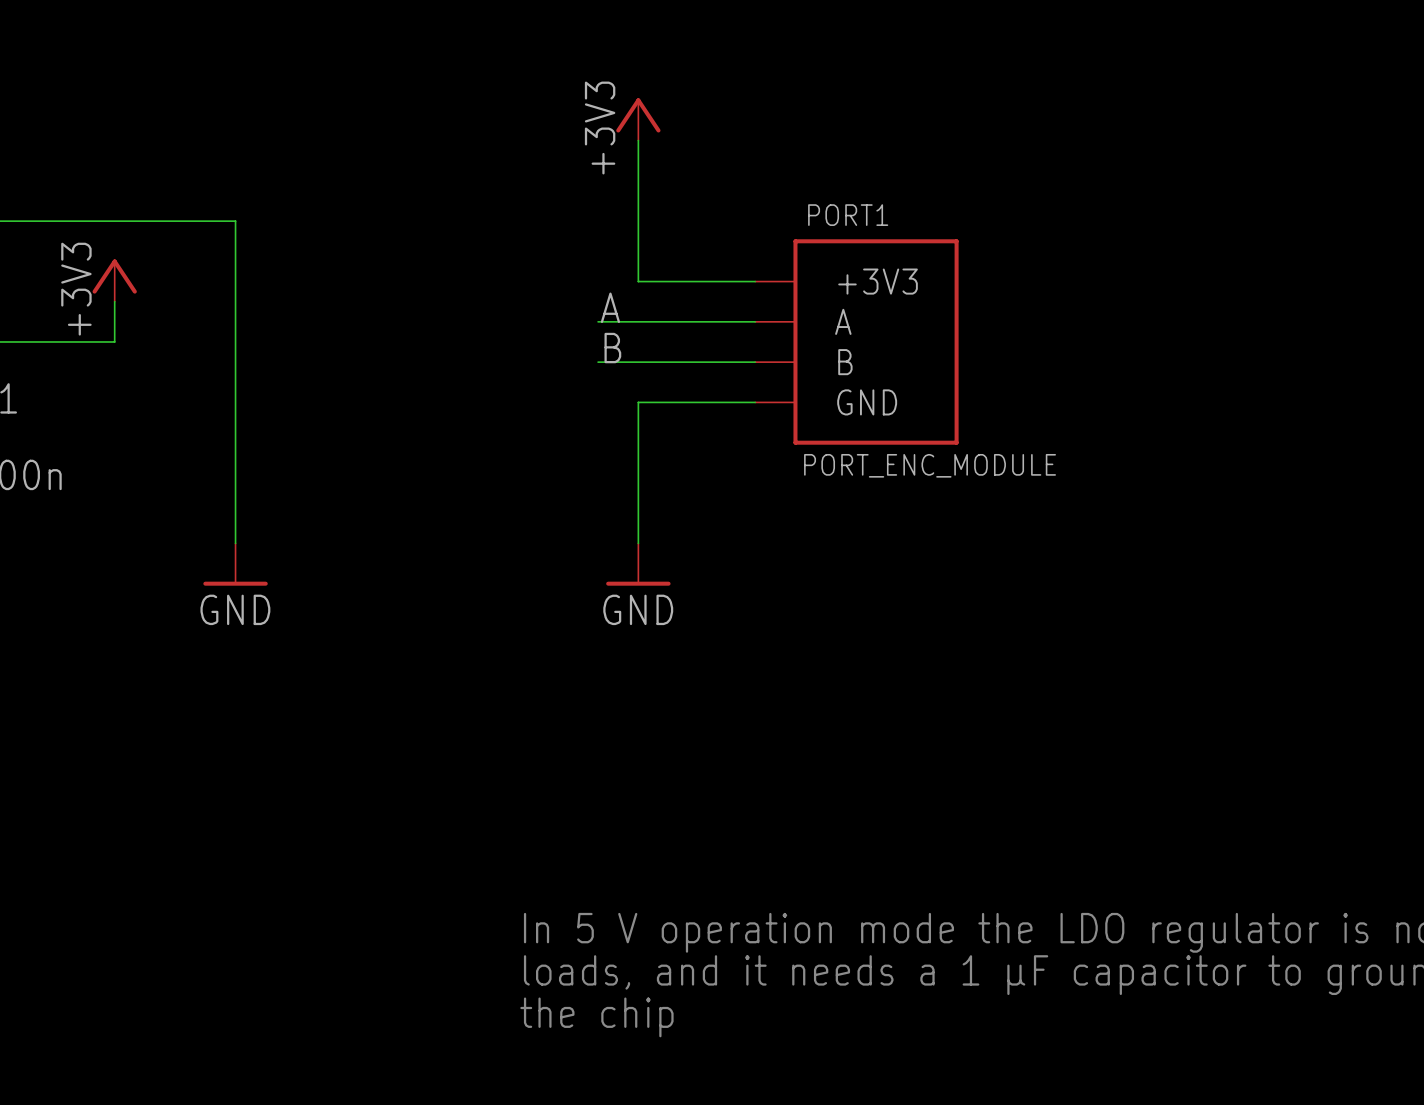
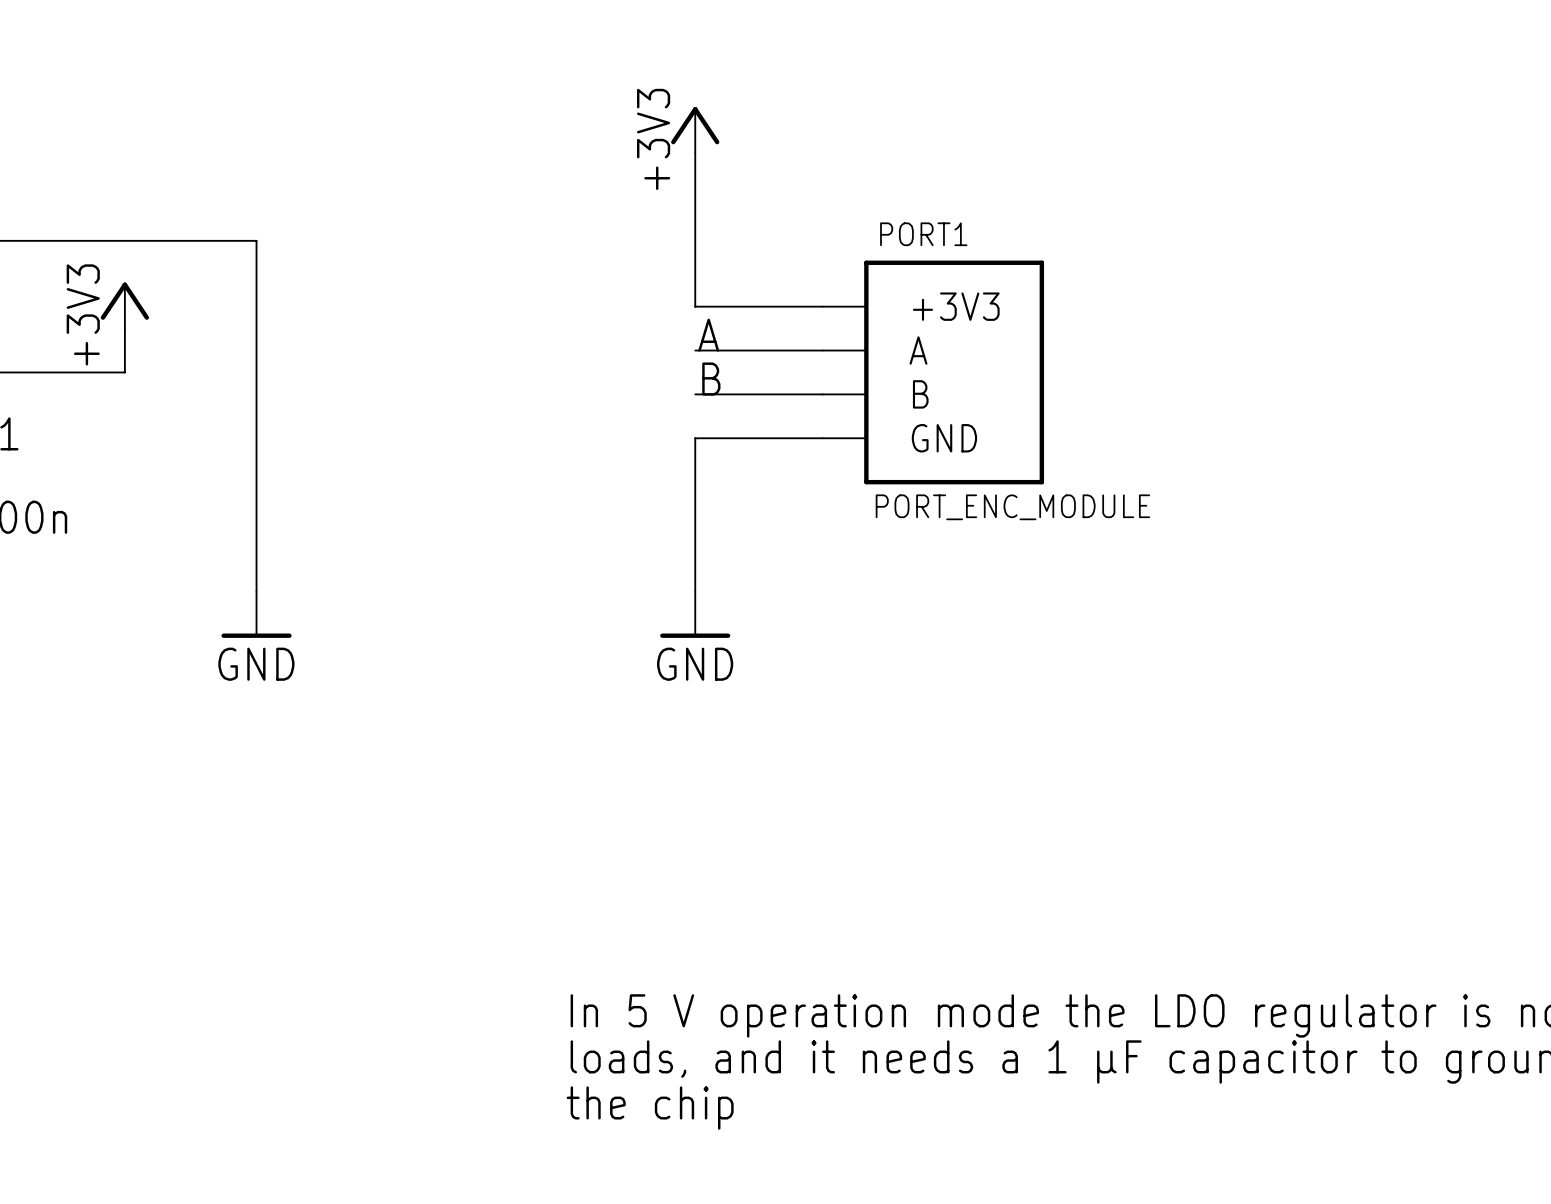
label position: A (610, 307) -> A (708, 335)
wire: (598, 321) (638, 321) -> none
label position: B (612, 348) -> B (711, 379)
wire: (598, 362) (638, 362) -> none

